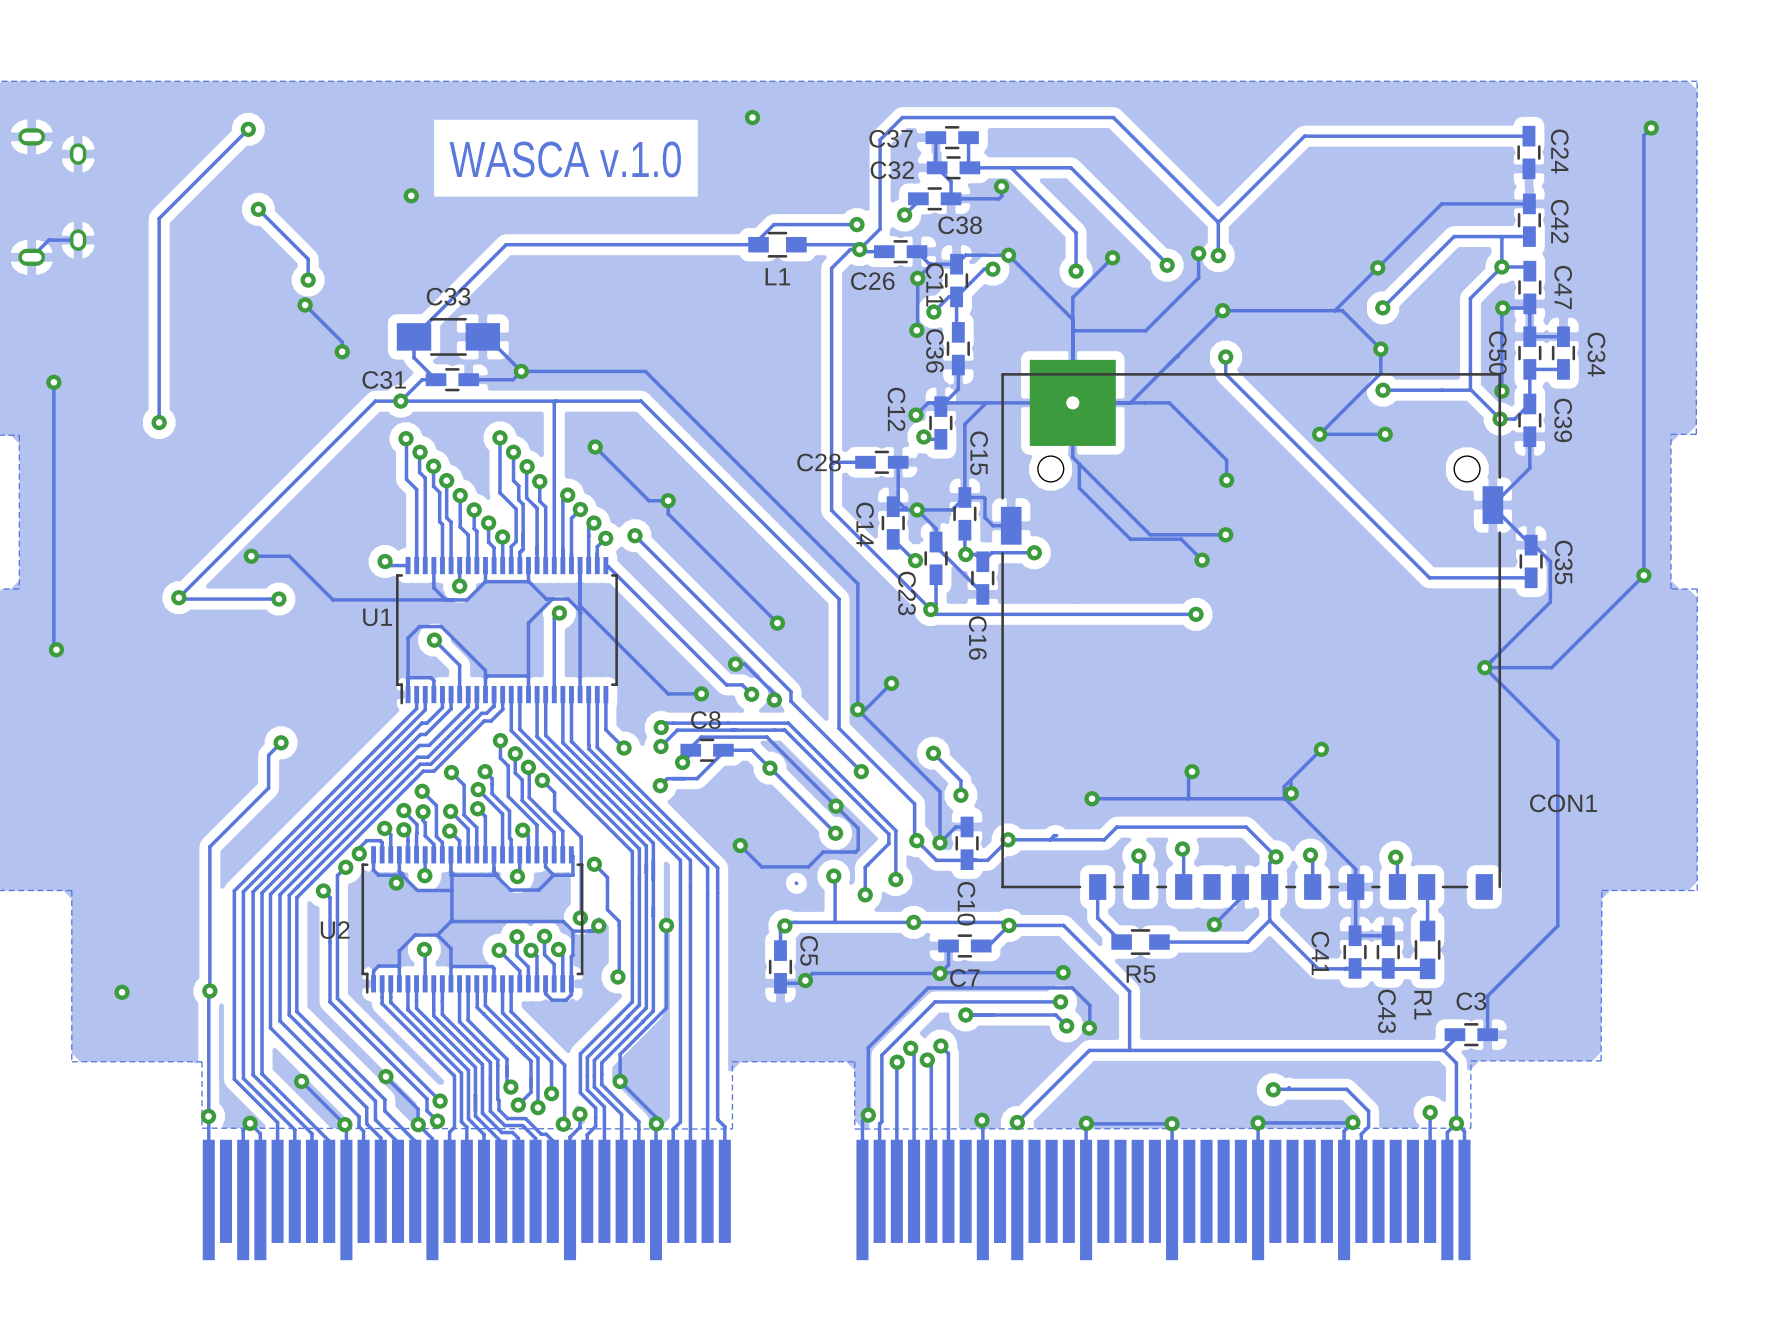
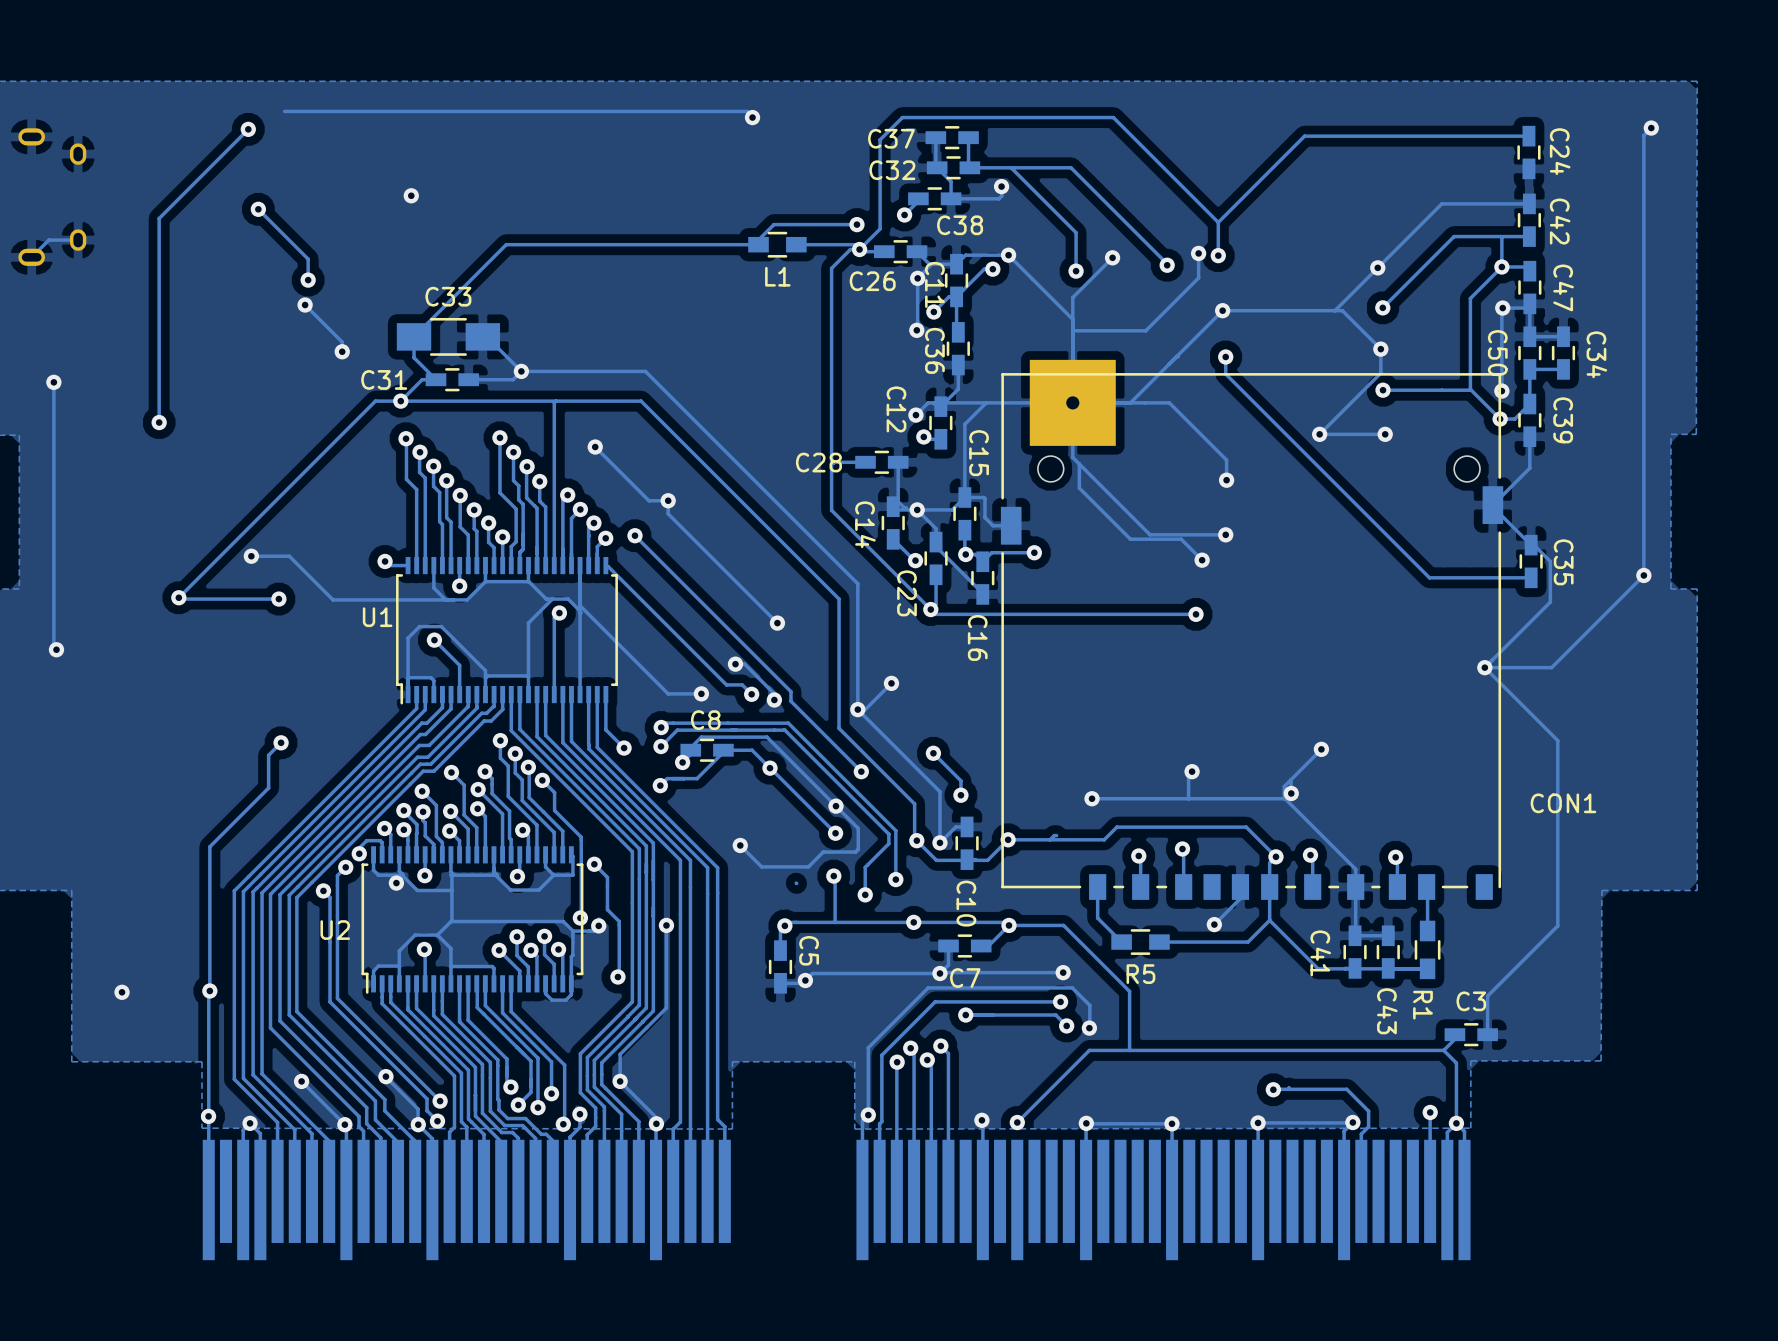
track: none -> (284, 111) (747, 111) (752, 116)
text: WASCA v.1.0 (565, 159) -> none

